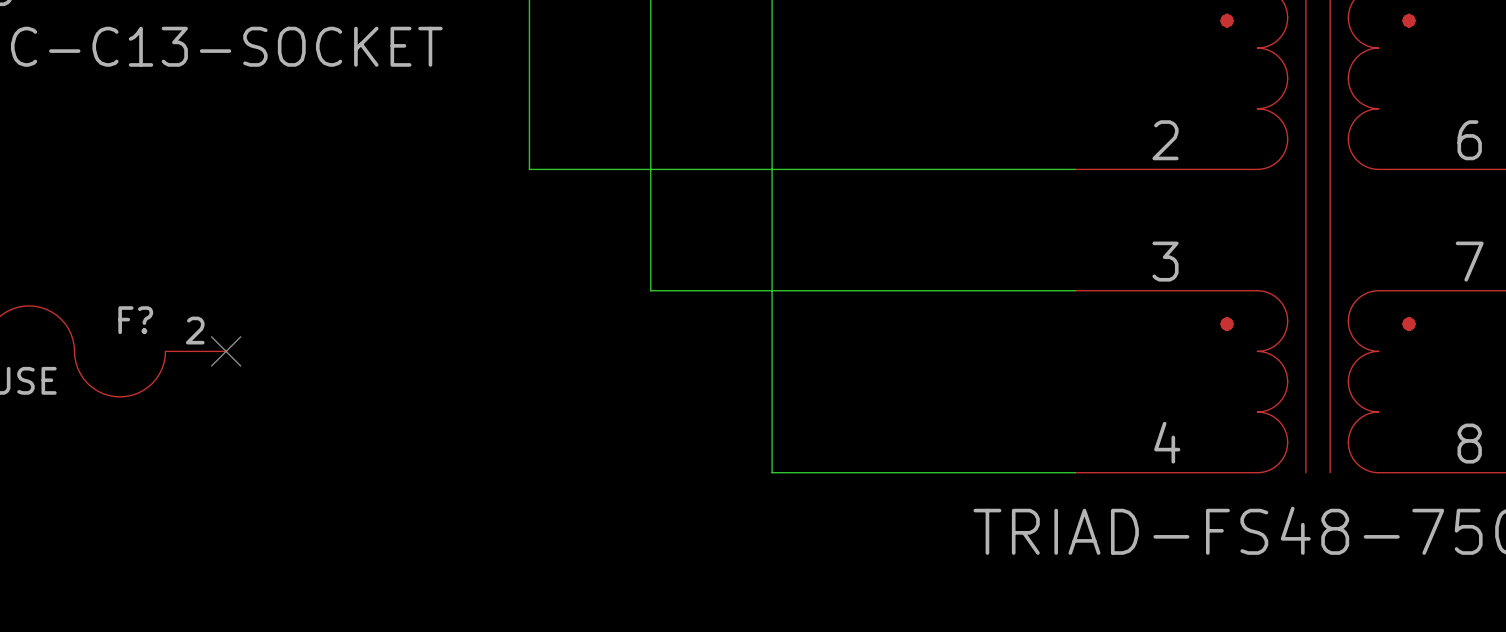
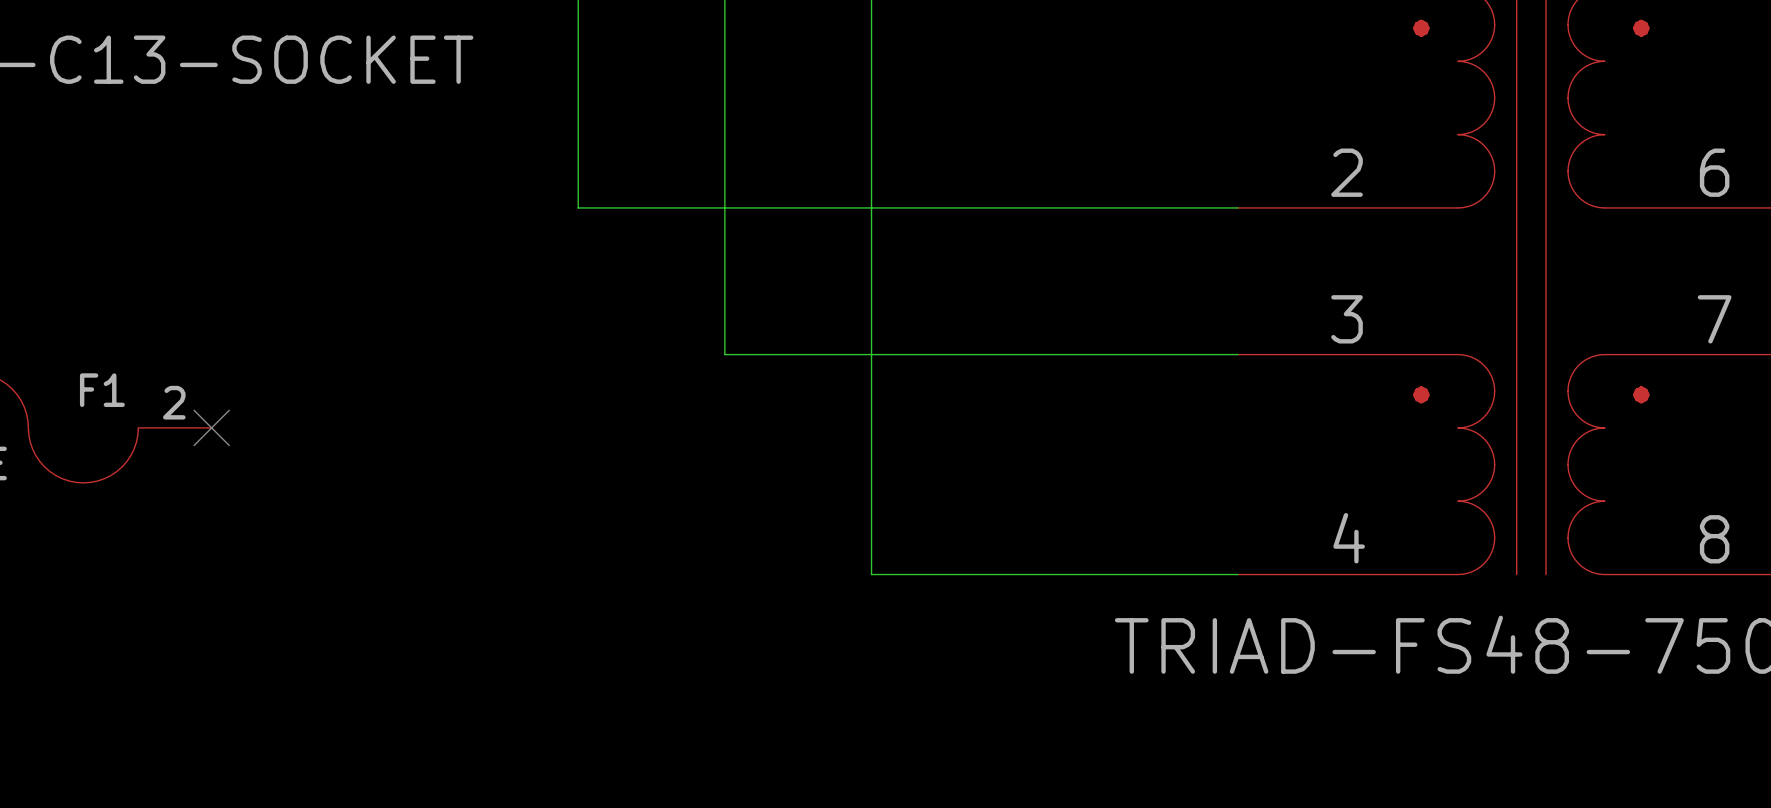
F? name: F? (135, 320) -> F1 (102, 390)

